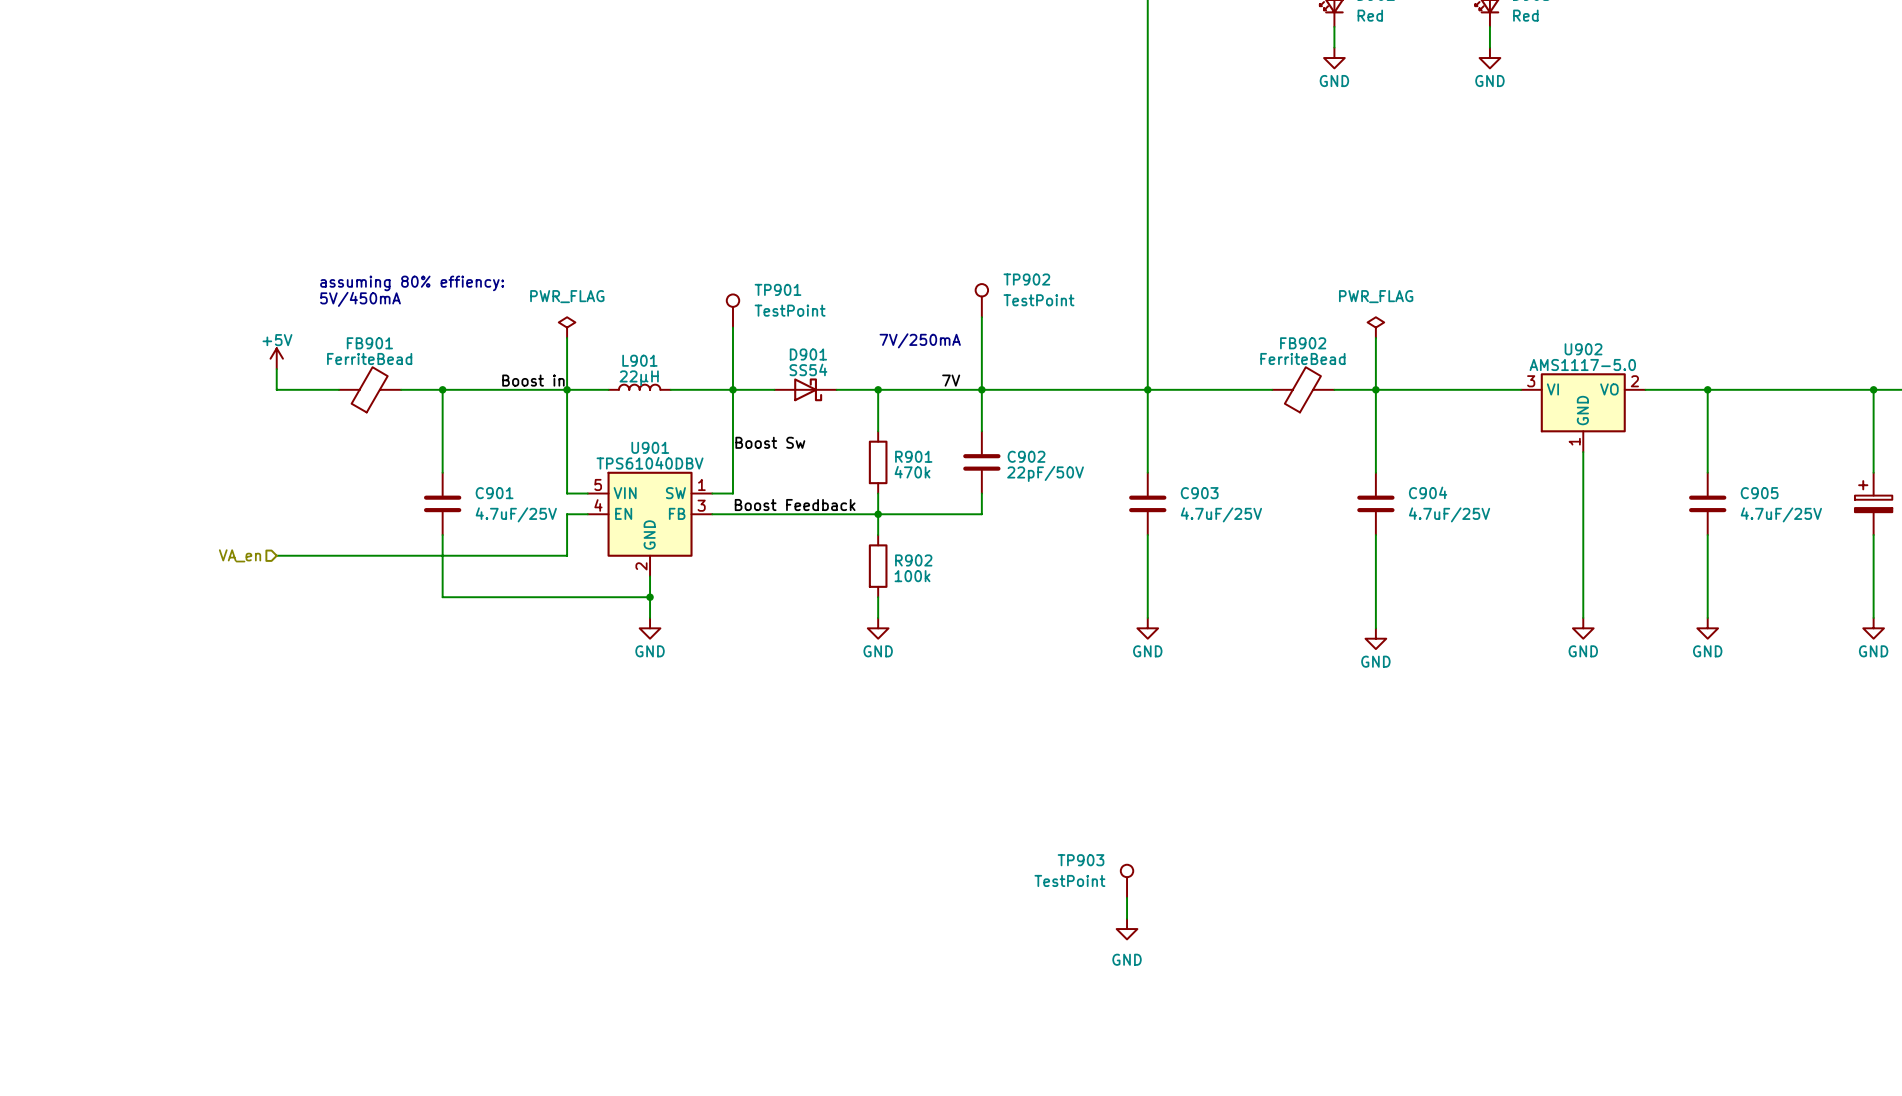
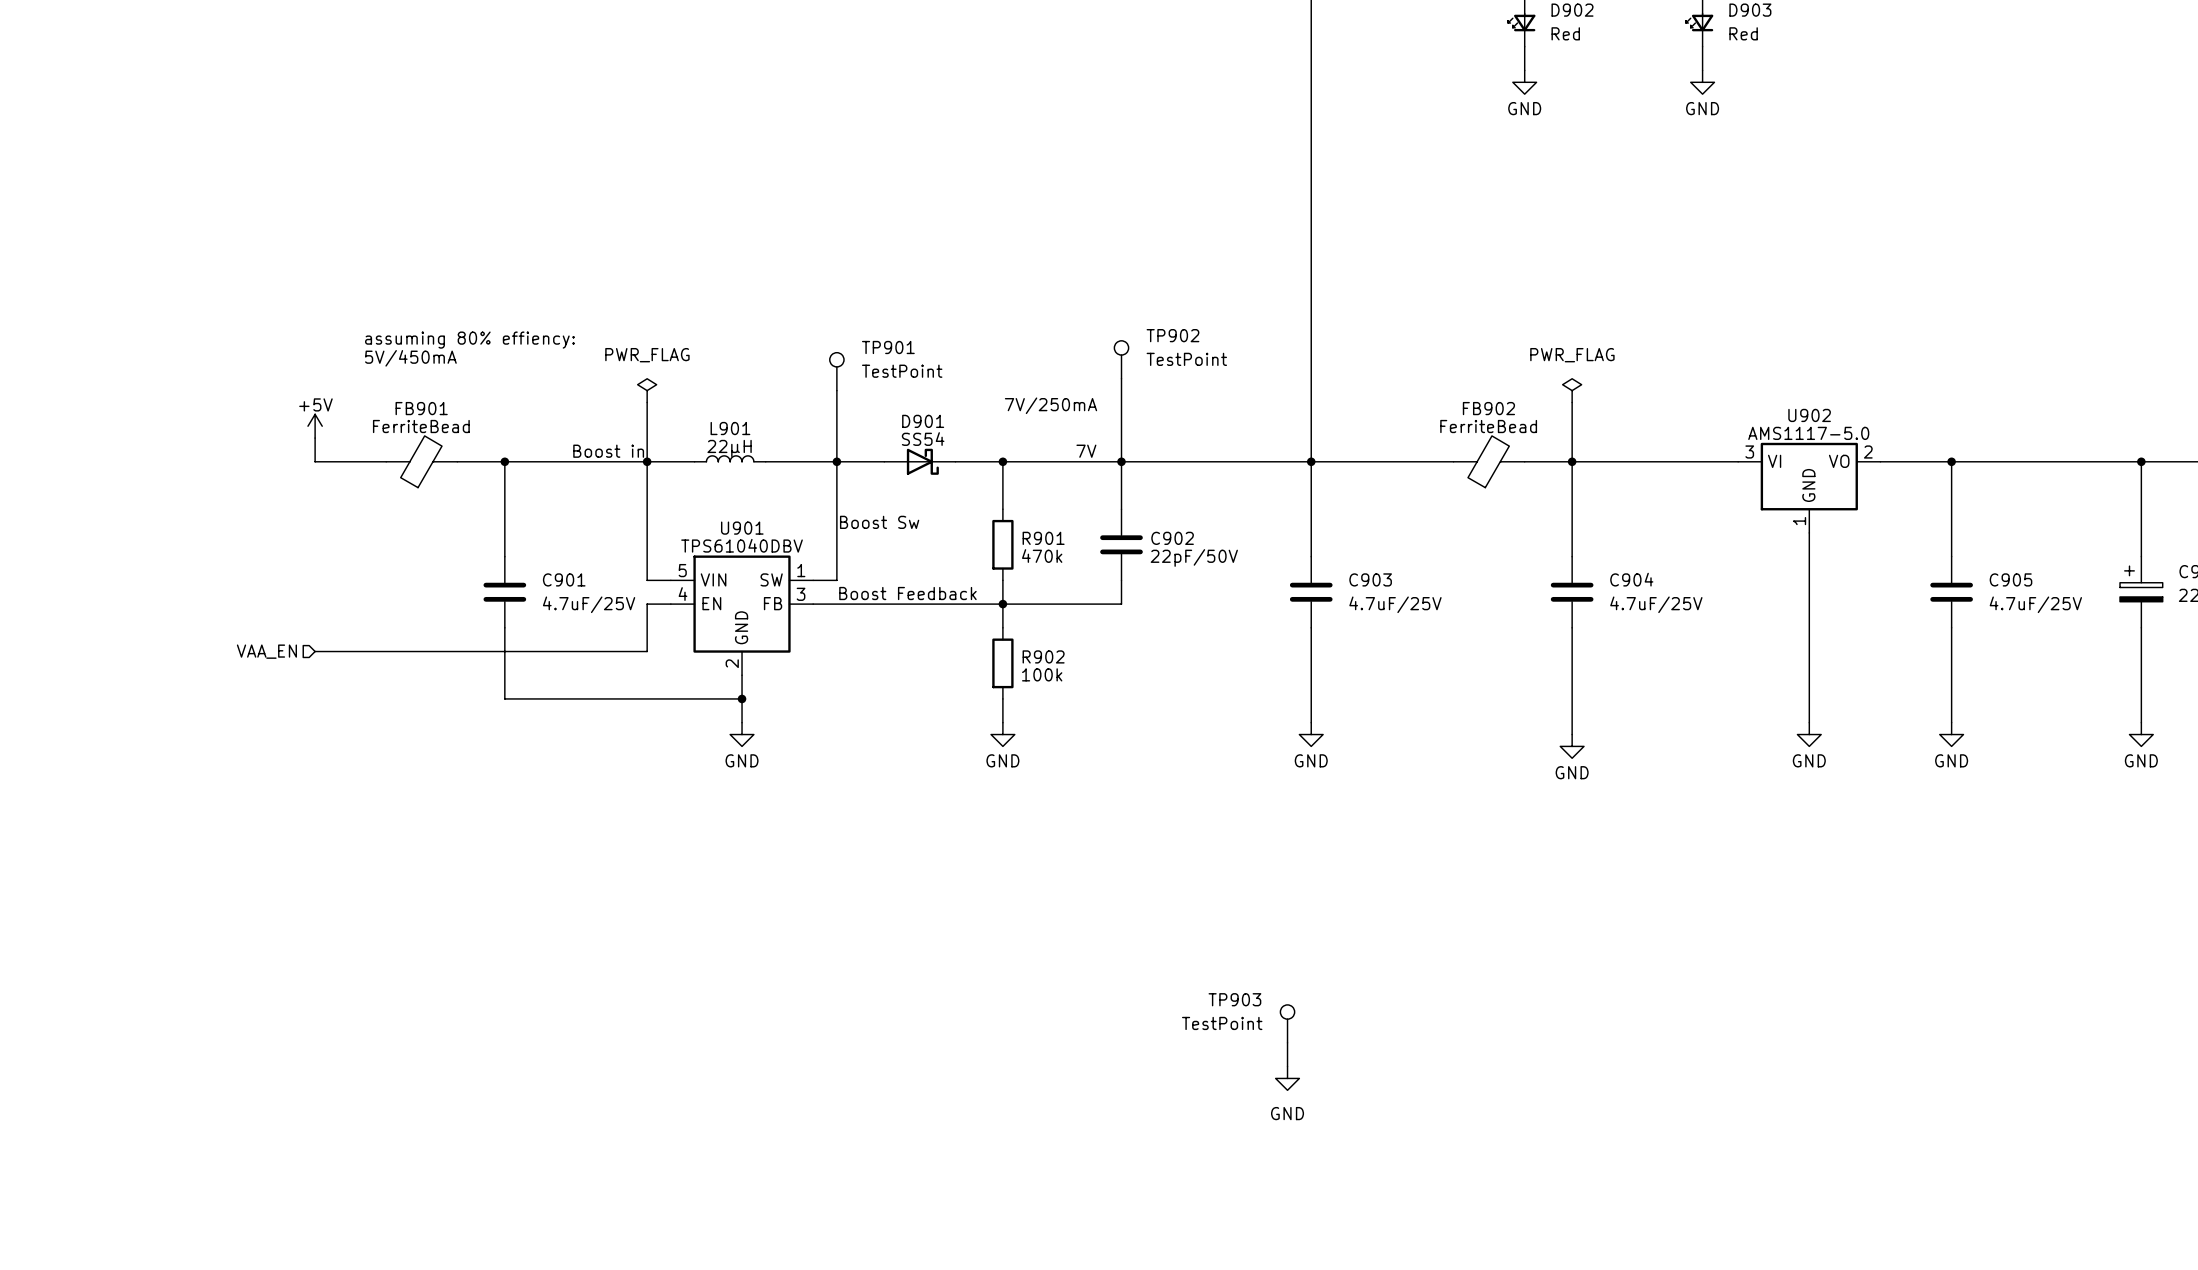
hierarchical label: VA_en (240, 555) -> VAA_EN (266, 651)

